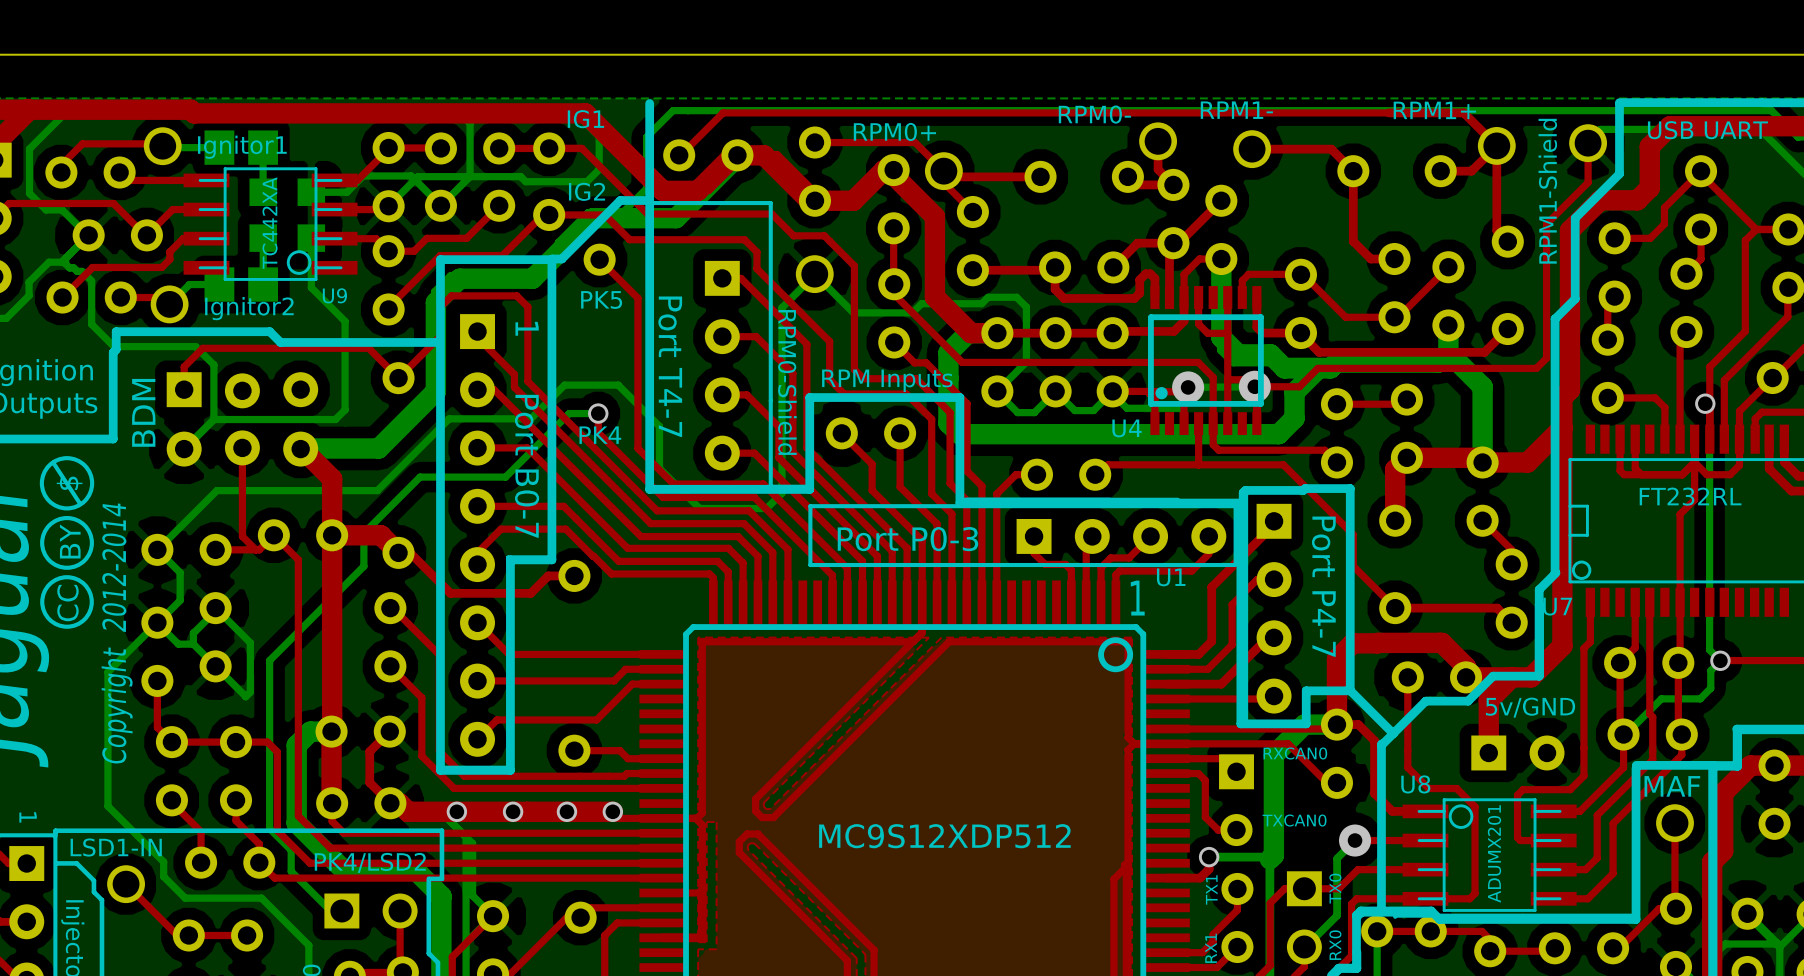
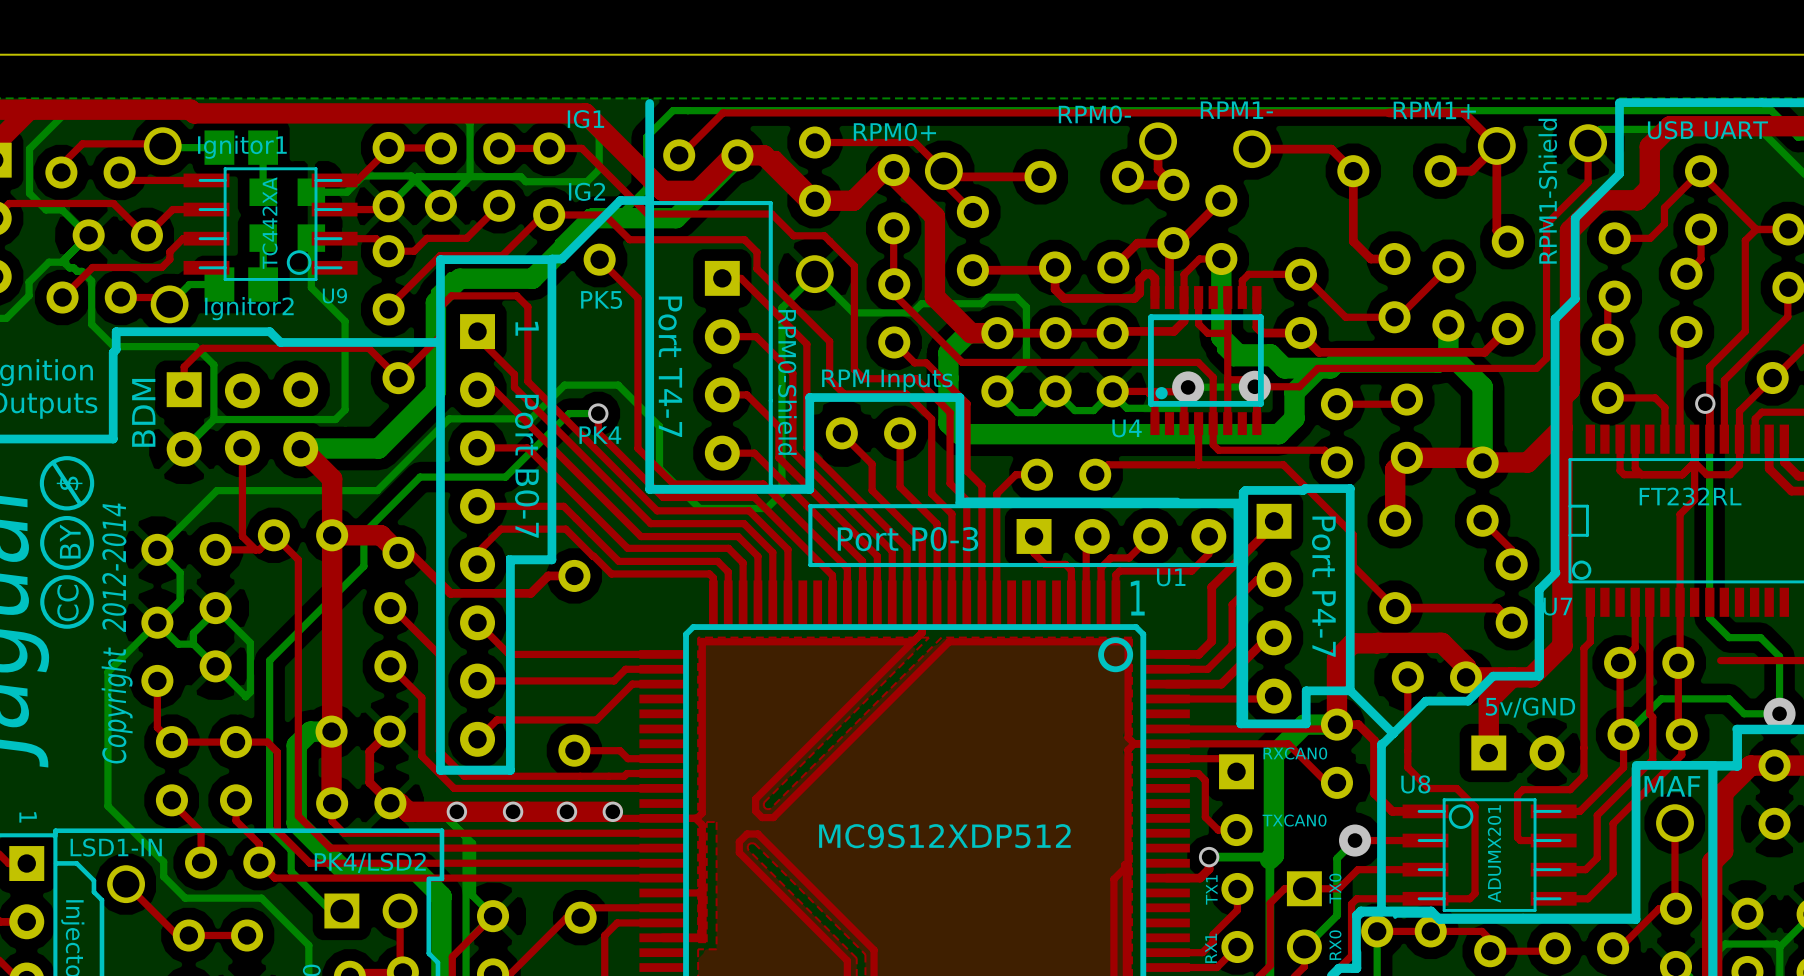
bottom track: (1709, 618) (1709, 649) (1720, 660) -> (1709, 618) (1729, 637) (1760, 637) (1779, 656) (1779, 713) (1744, 713) (1729, 698) (1700, 698)
via: (1720, 660) -> none
bottom track: (1720, 661) (1710, 670) (1710, 688) (1700, 698) -> none
via: none -> (1779, 713)
bottom track: (1747, 913) (1776, 944) -> none

